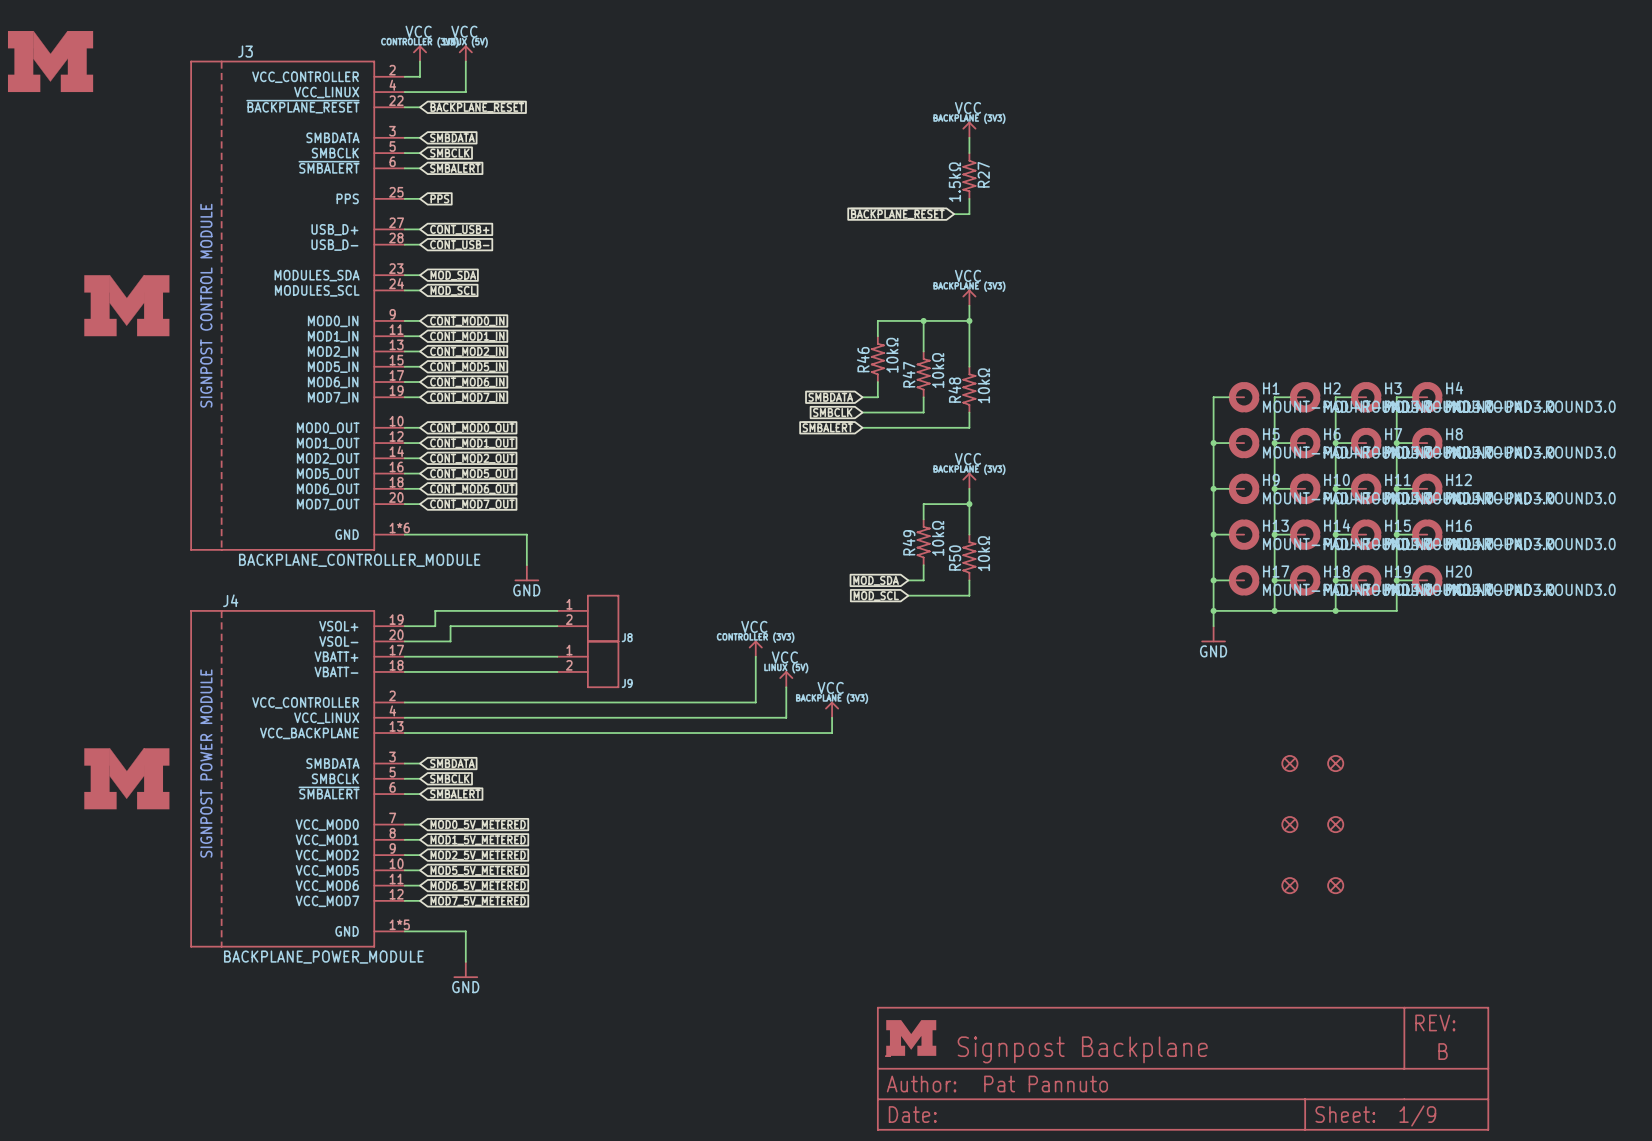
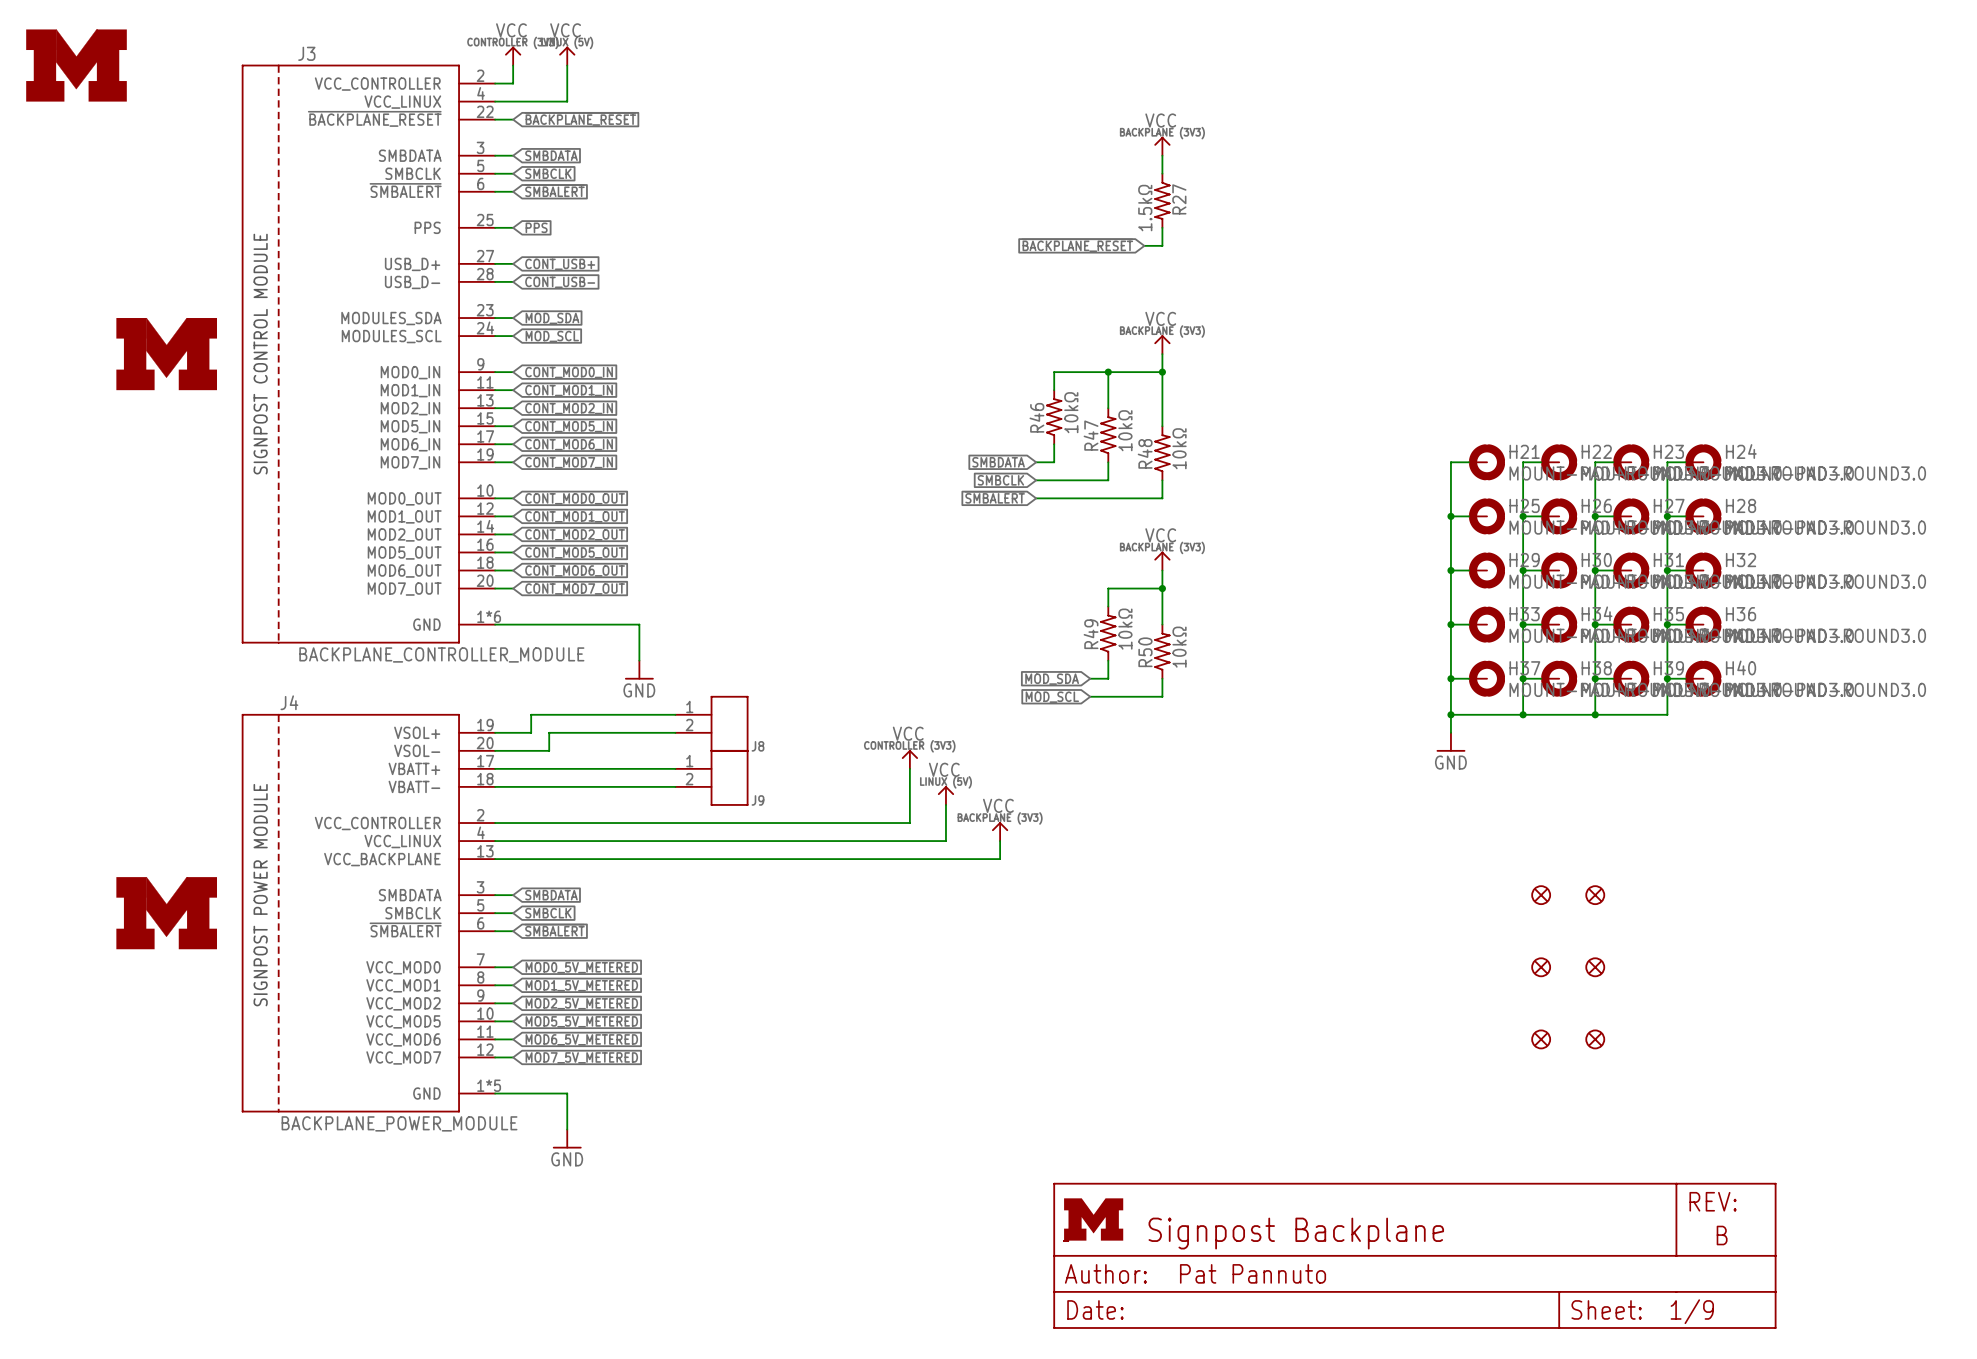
H1 name: H1 (1271, 388) -> H21 (1524, 451)
H2 name: H2 (1332, 388) -> H22 (1596, 451)
H3 name: H3 (1393, 388) -> H23 (1668, 451)
H4 name: H4 (1454, 388) -> H24 (1741, 451)
H5 name: H5 (1271, 434) -> H25 (1524, 505)
H6 name: H6 (1332, 434) -> H26 (1596, 505)
H7 name: H7 (1393, 434) -> H27 (1669, 505)
H8 name: H8 (1454, 434) -> H28 (1741, 505)
H9 name: H9 (1271, 479) -> H29 (1524, 560)
H10 name: H10 (1336, 479) -> H30 (1596, 560)
H11 name: H11 (1397, 479) -> H31 (1668, 560)
H12 name: H12 (1459, 479) -> H32 (1741, 560)
H13 name: H13 (1275, 525) -> H33 (1524, 614)
H14 name: H14 (1337, 525) -> H34 (1597, 613)
H15 name: H15 (1397, 525) -> H35 (1668, 614)
H16 name: H16 (1459, 525) -> H36 (1741, 614)
H17 name: H17 (1276, 571) -> H37 (1524, 668)
H18 name: H18 (1336, 571) -> H38 (1596, 668)
H19 name: H19 (1397, 571) -> H39 (1668, 668)
H20 name: H20 (1459, 571) -> H40 (1741, 667)

